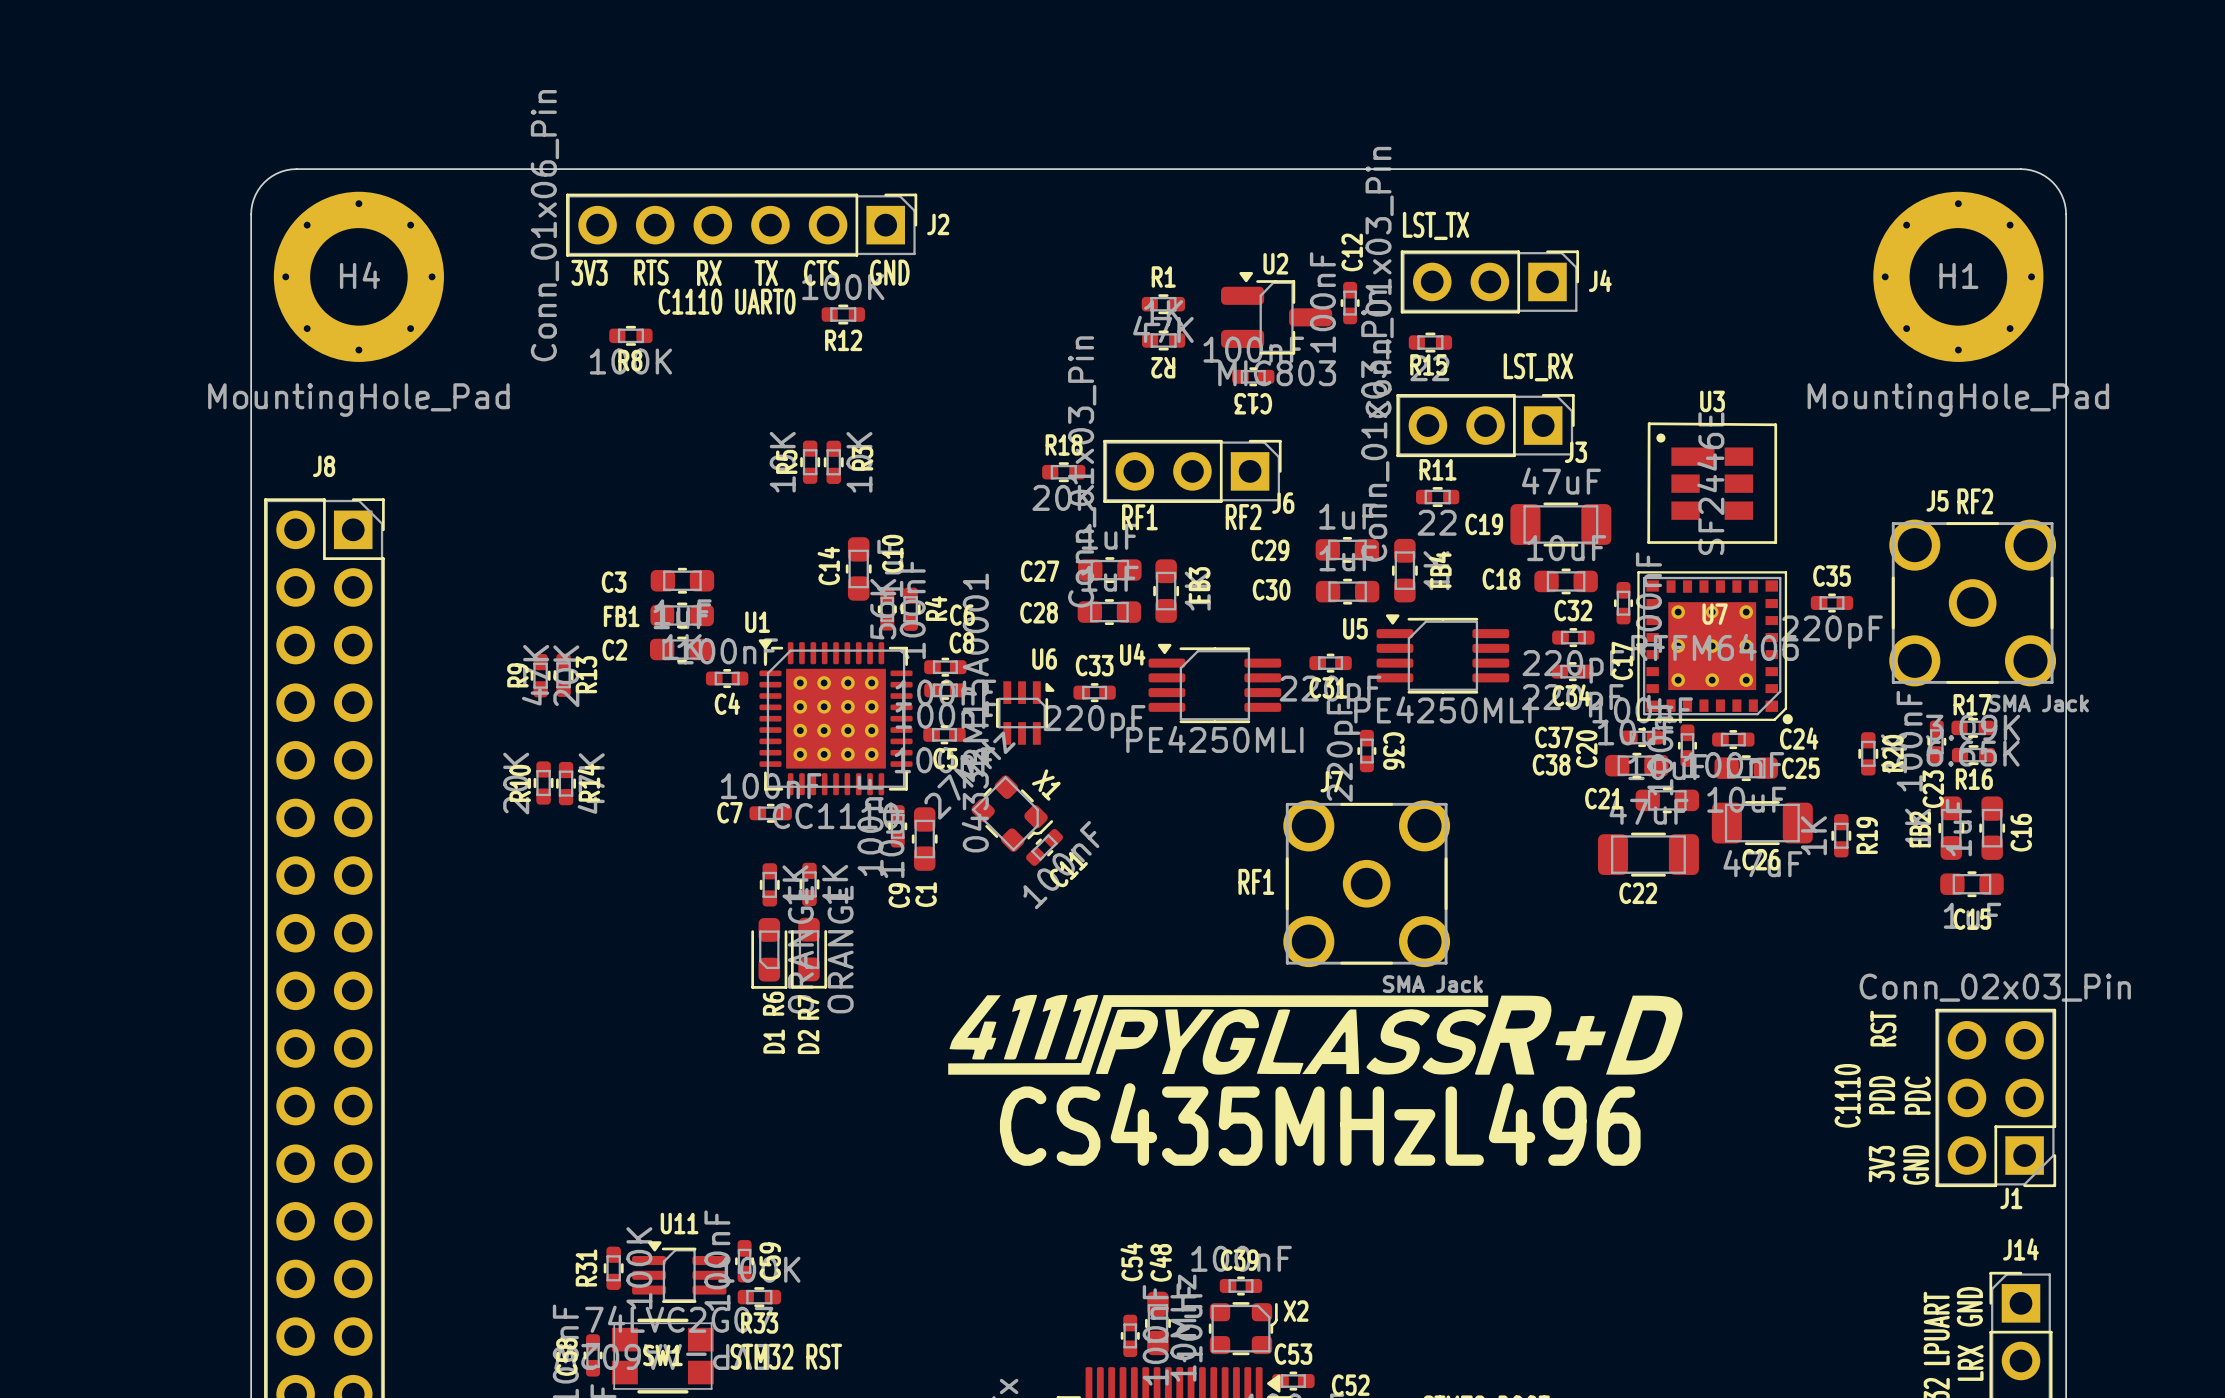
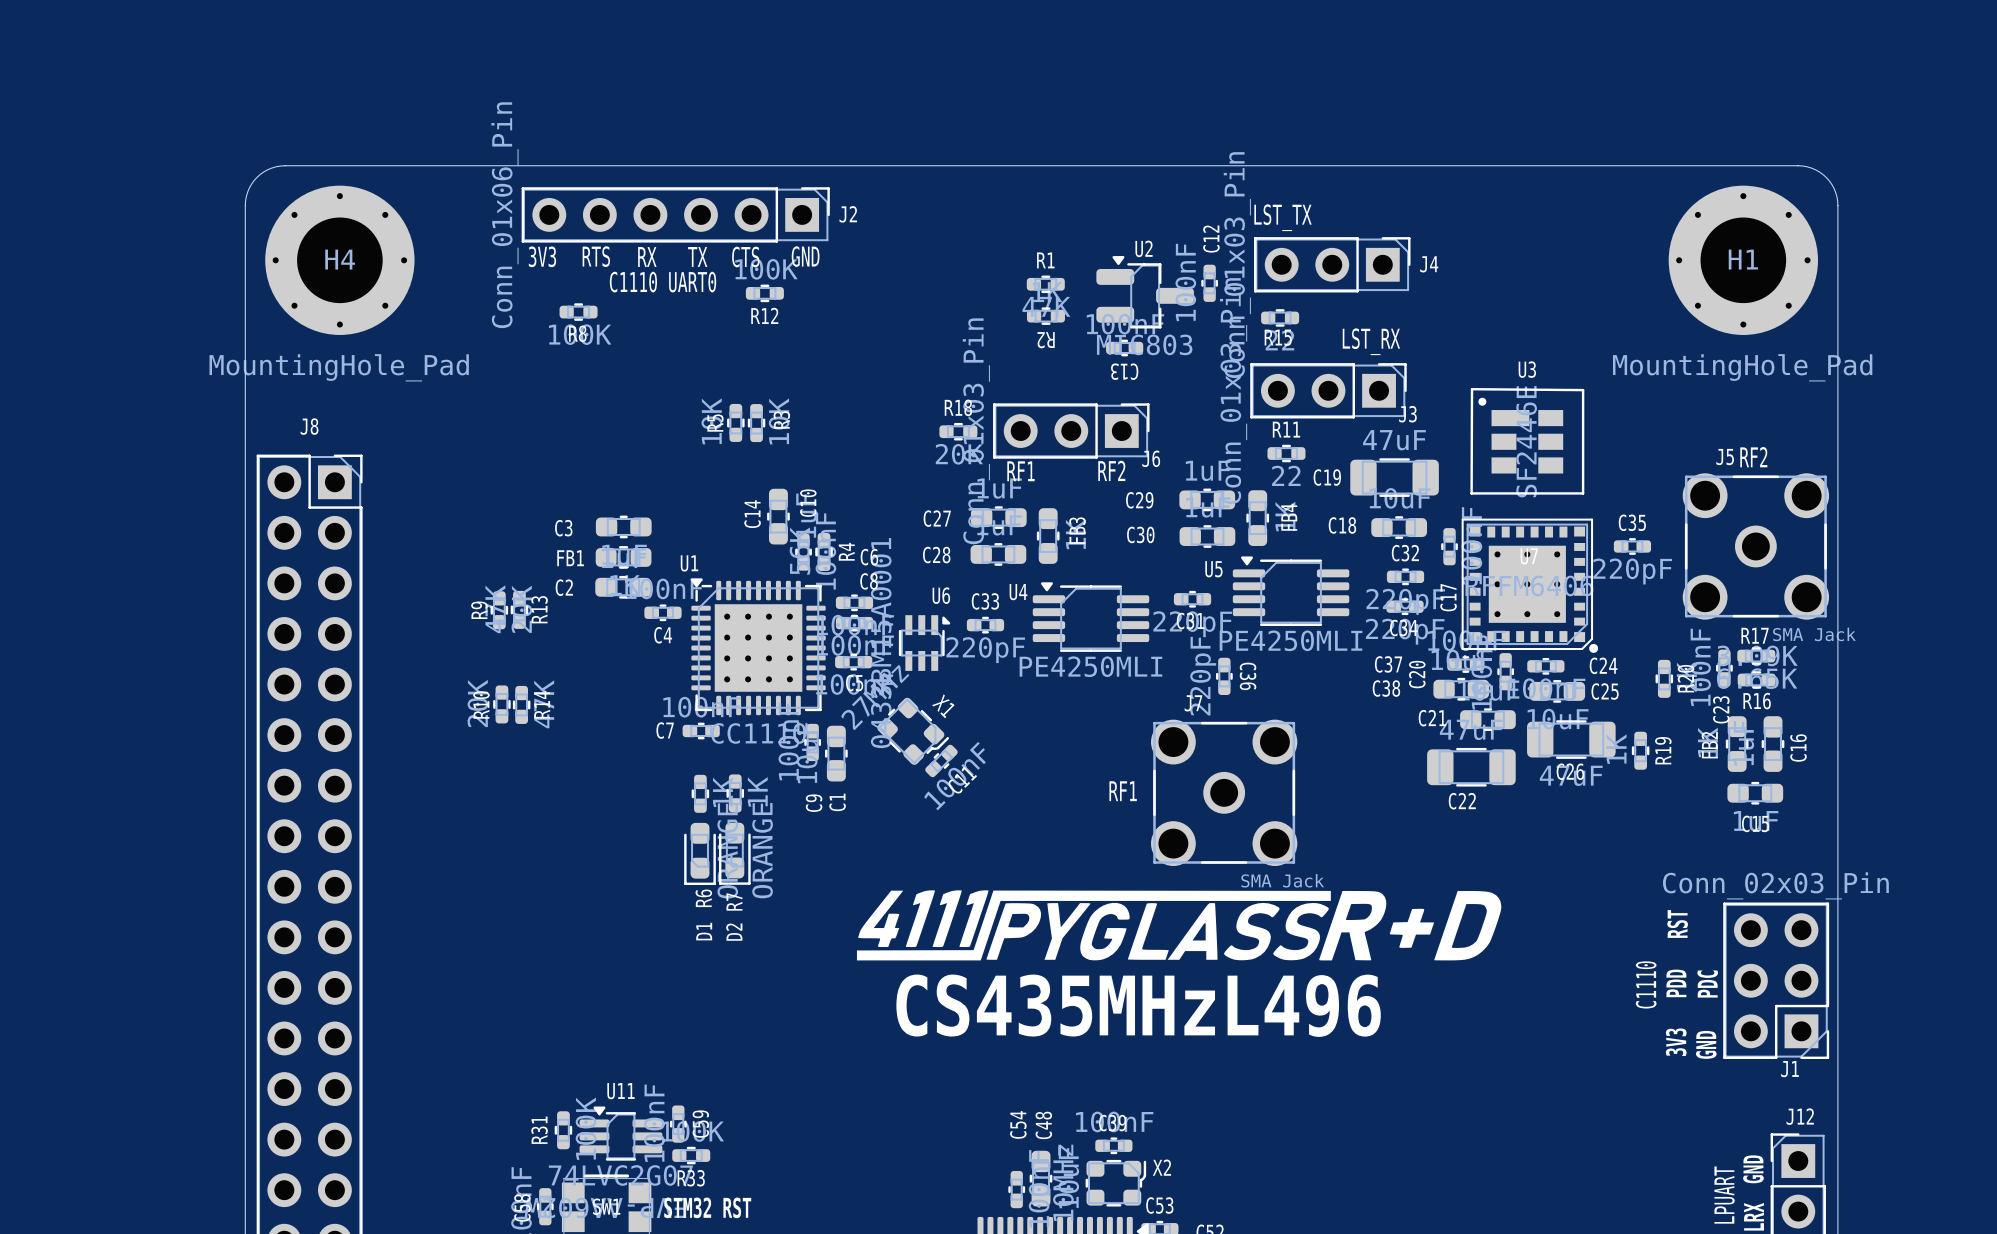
J14 name: J14 (2020, 1249) -> J12 (1800, 1116)

